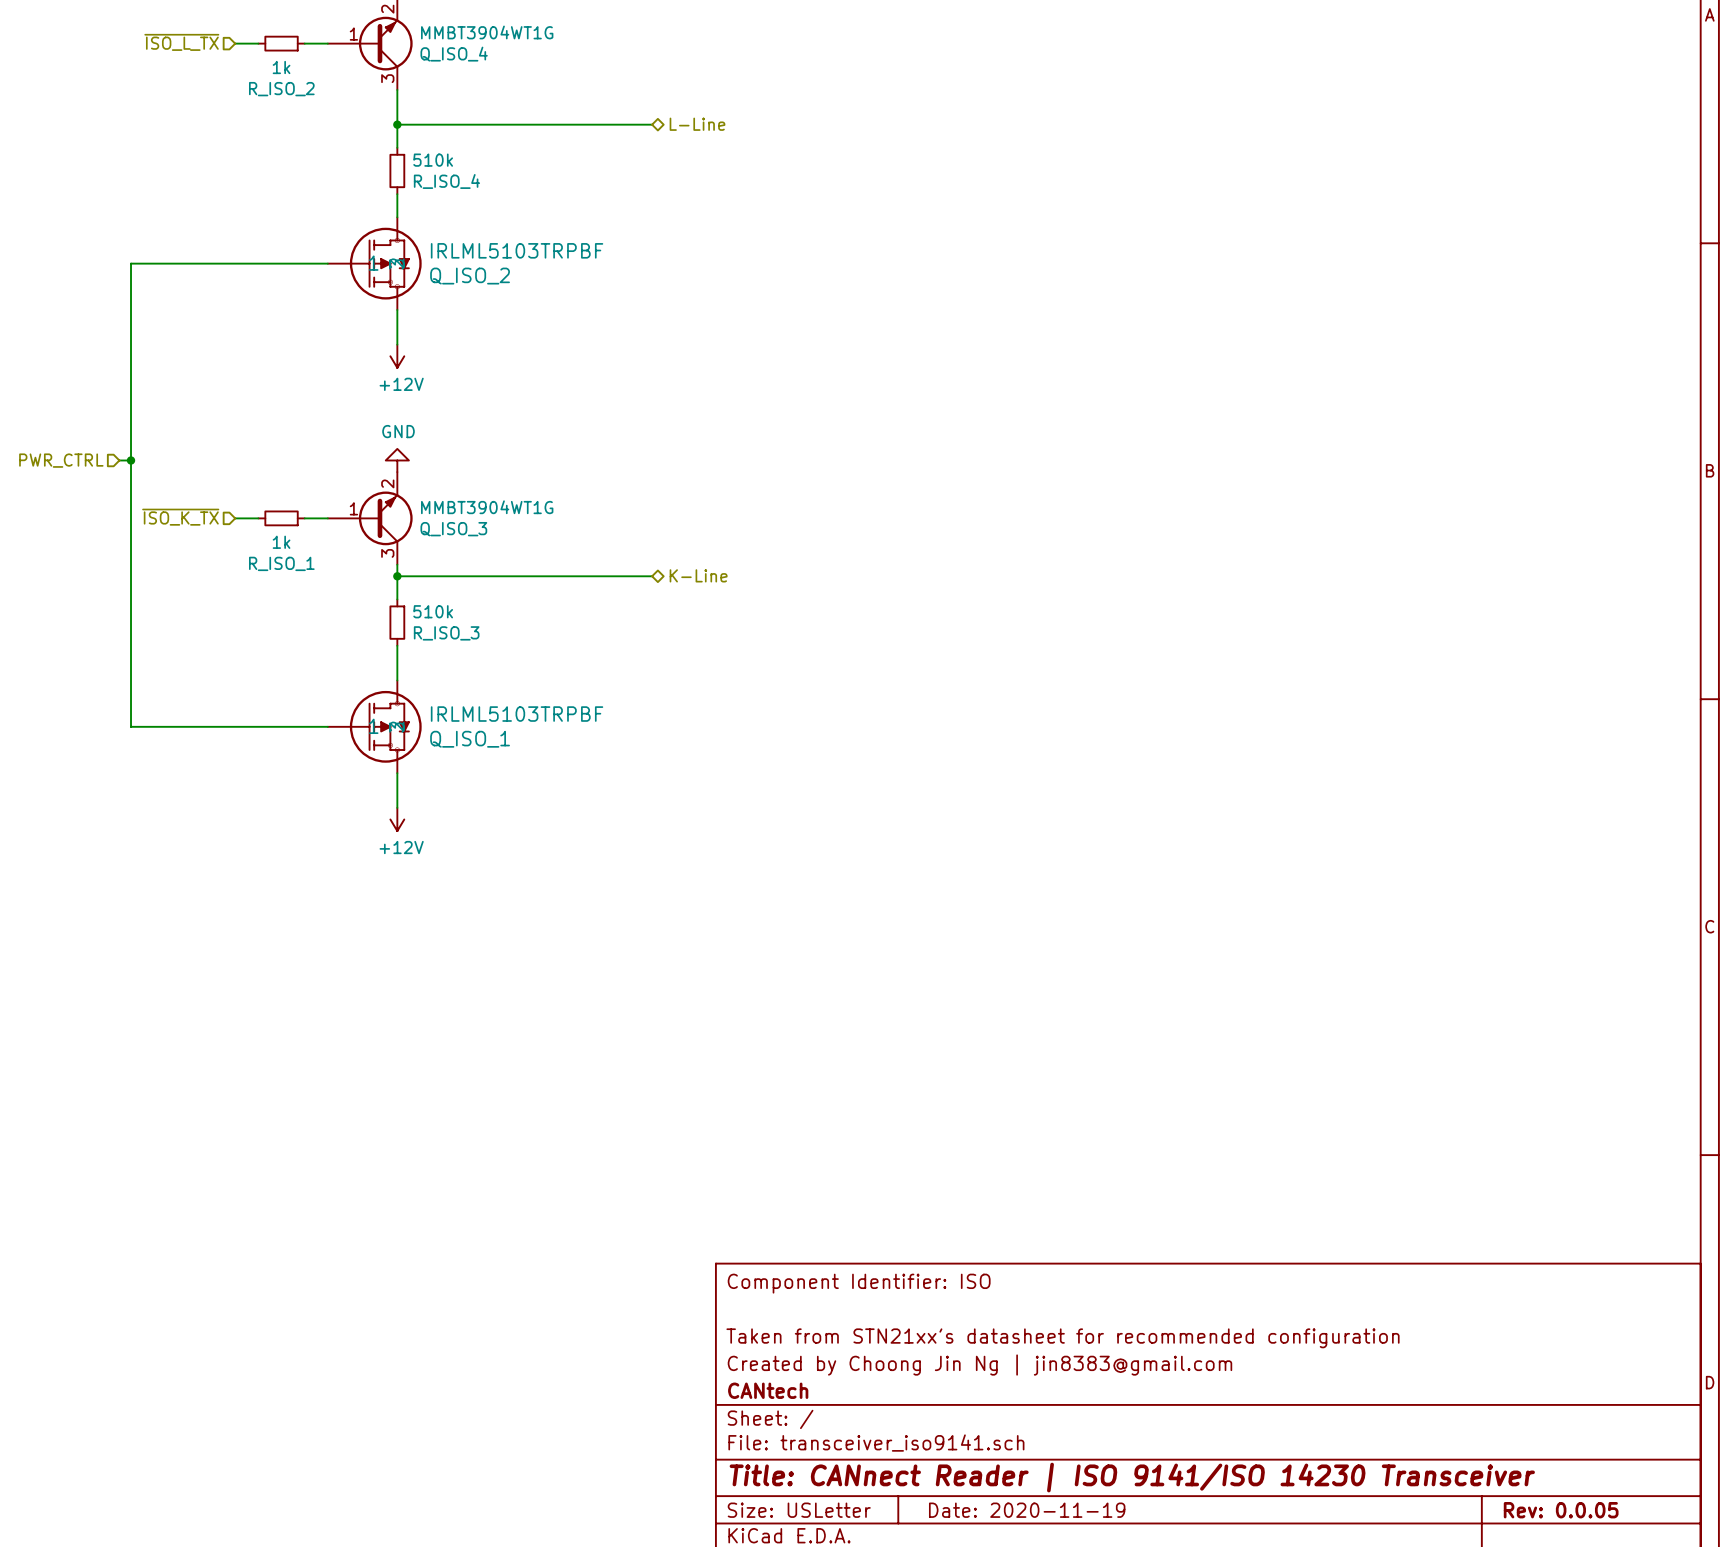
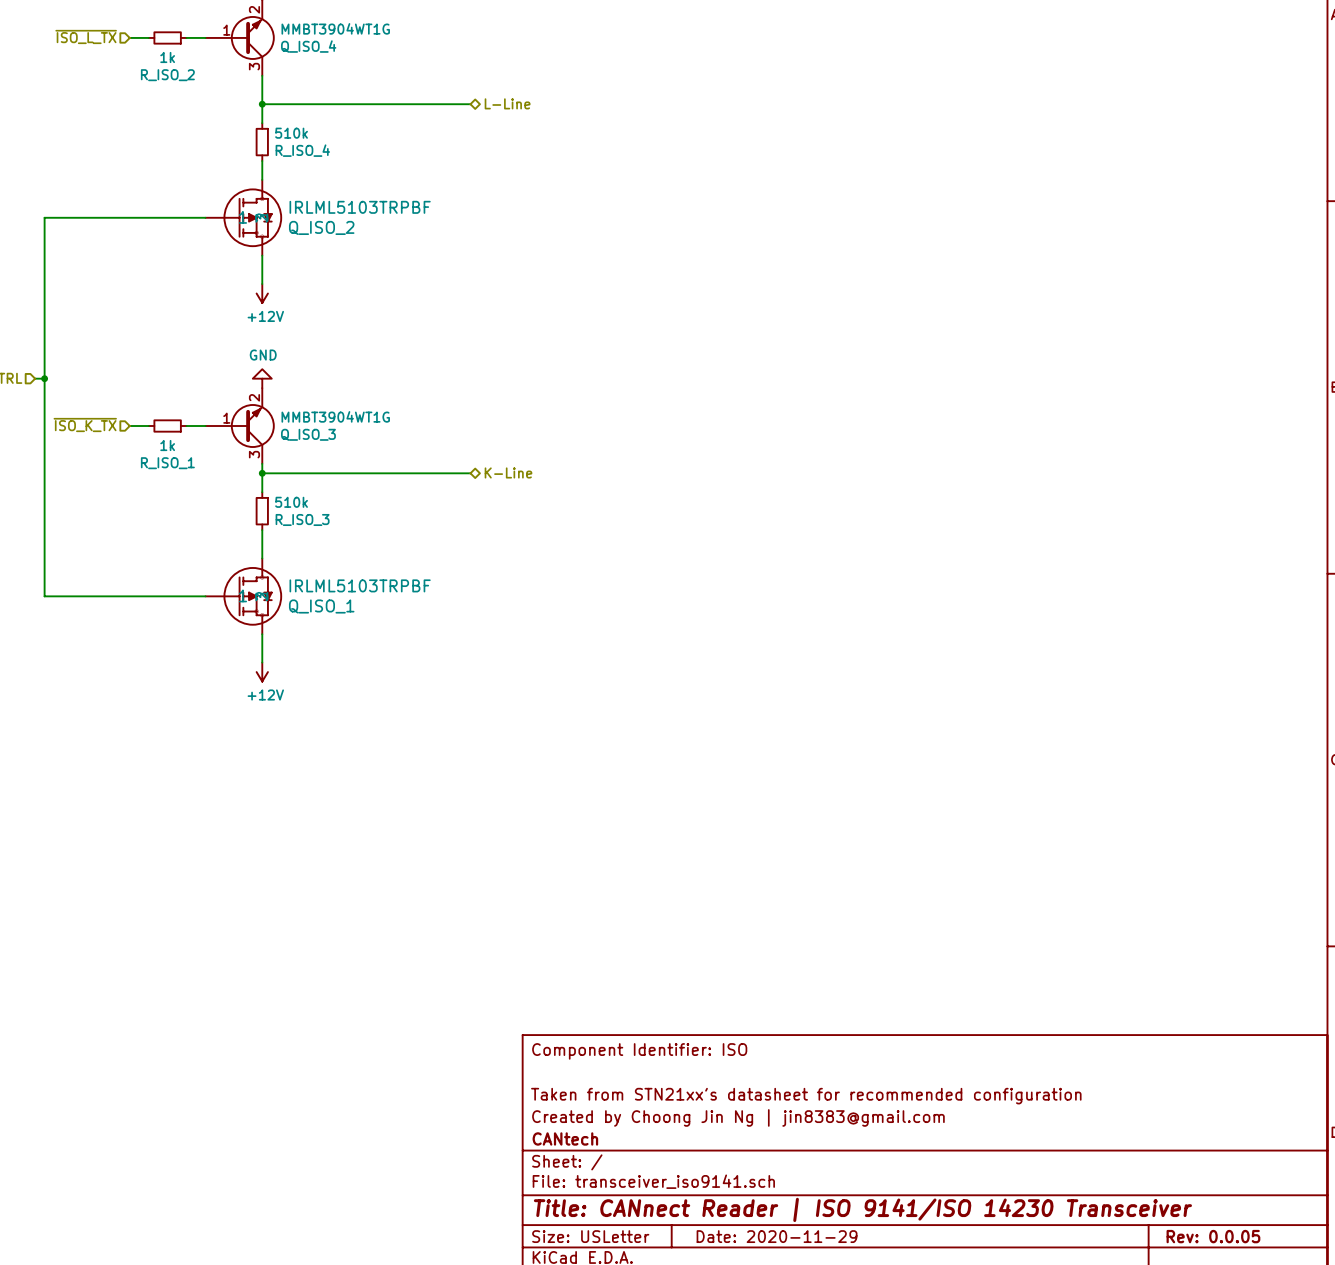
title block: Date: 2020-11-19 (1027, 1510) -> Date: 2020-11-29 (777, 1236)

